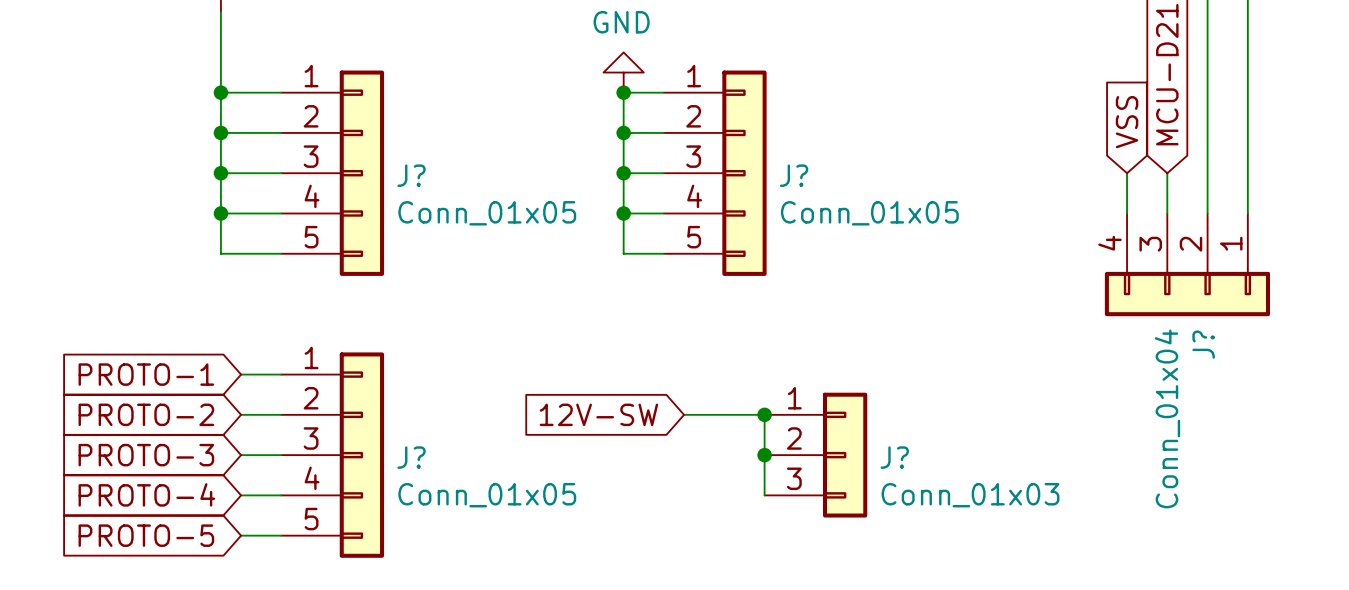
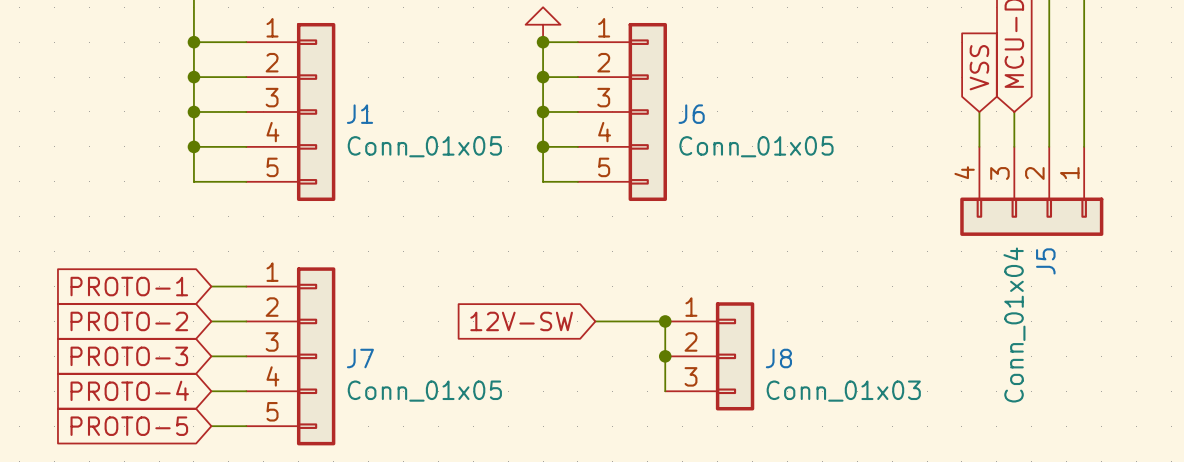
J? name: J? (411, 175) -> J1 (360, 114)
J? name: J? (794, 175) -> J6 (691, 114)
J? name: J? (1203, 344) -> J5 (1045, 261)
J? name: J? (411, 457) -> J7 (360, 358)
J? name: J? (894, 457) -> J8 (778, 358)

